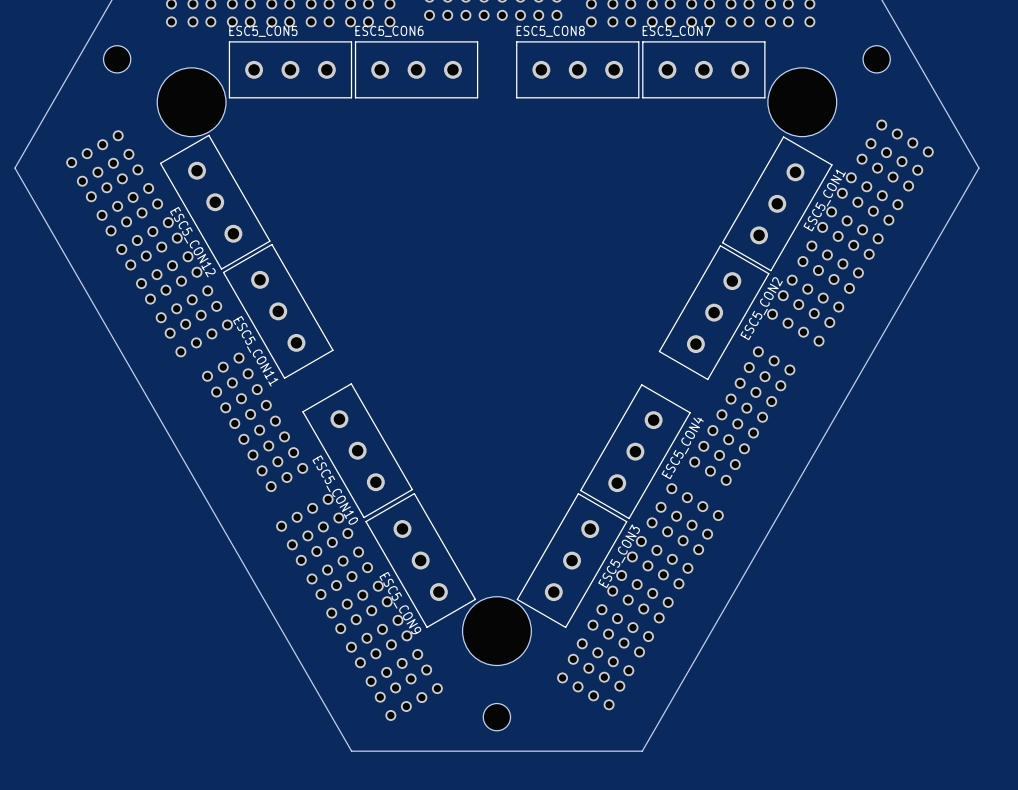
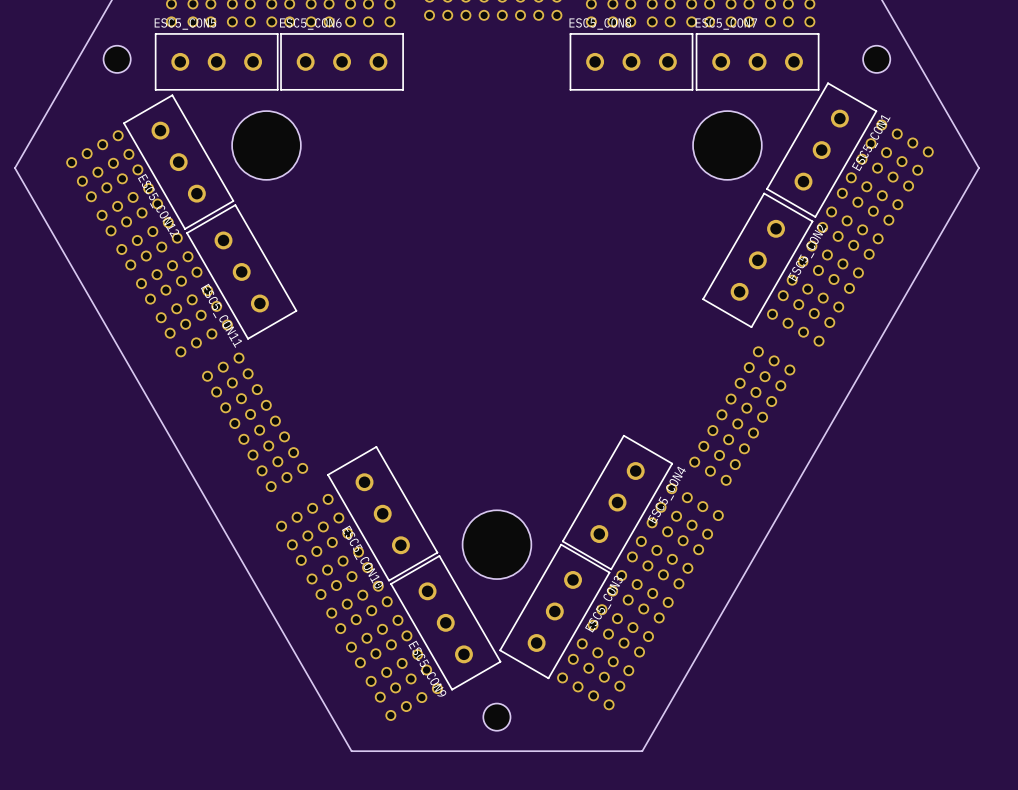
ESC5_CON5 position: (290, 69) -> (216, 61)
ESC5_CON6 position: (416, 69) -> (342, 61)
ESC5_CON8 position: (577, 69) -> (631, 61)
ESC5_CON7 position: (703, 69) -> (757, 61)
hole position: (191, 102) -> (266, 145)
hole position: (802, 102) -> (727, 145)
ESC5_CON12 position: (215, 202) -> (178, 162)
ESC5_CON1 position: (777, 203) -> (821, 150)
ESC5_CON11 position: (278, 311) -> (241, 271)
ESC5_CON2 position: (714, 312) -> (757, 260)
ESC5_CON10 position: (357, 450) -> (382, 513)
ESC5_CON4 position: (635, 451) -> (617, 502)
ESC5_CON9 position: (420, 560) -> (445, 622)
ESC5_CON3 position: (572, 560) -> (554, 611)
hole position: (496, 631) -> (496, 544)

